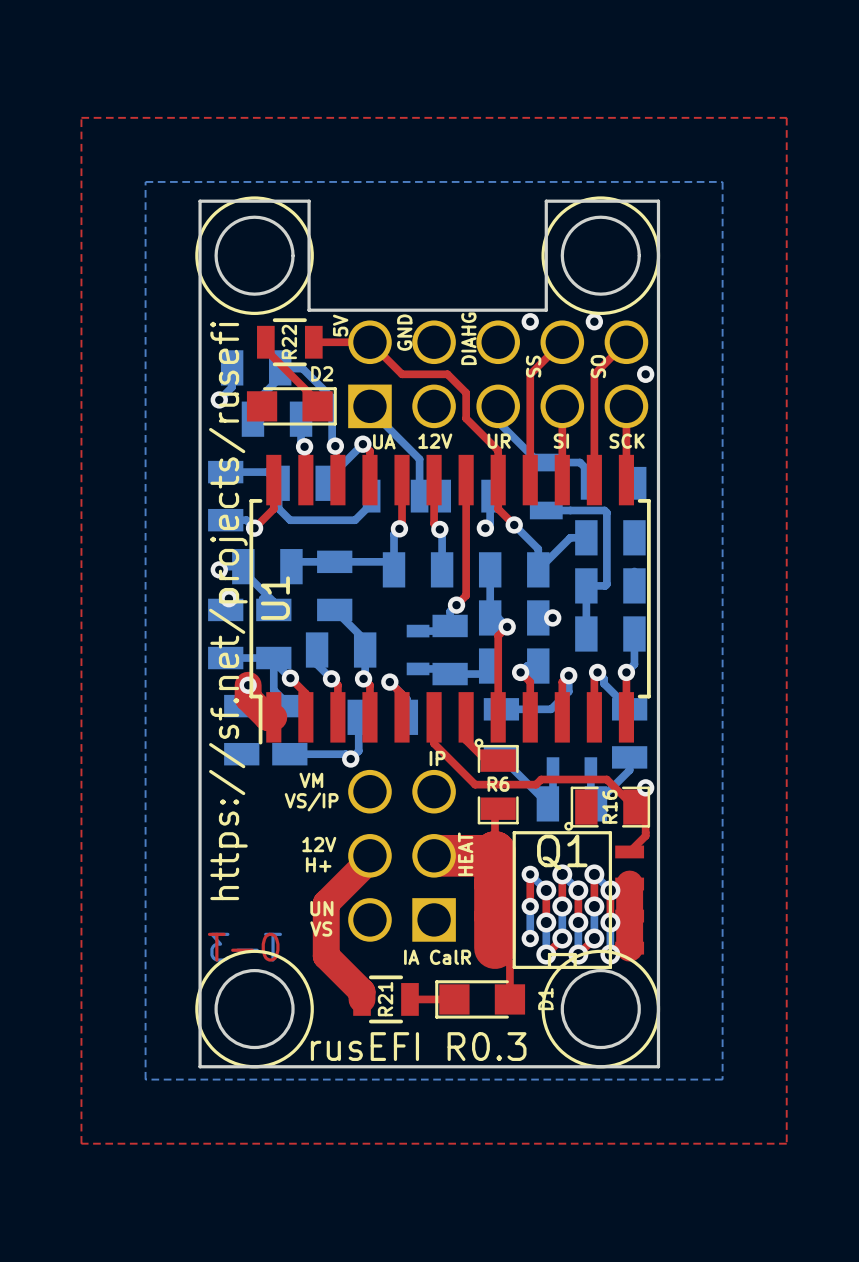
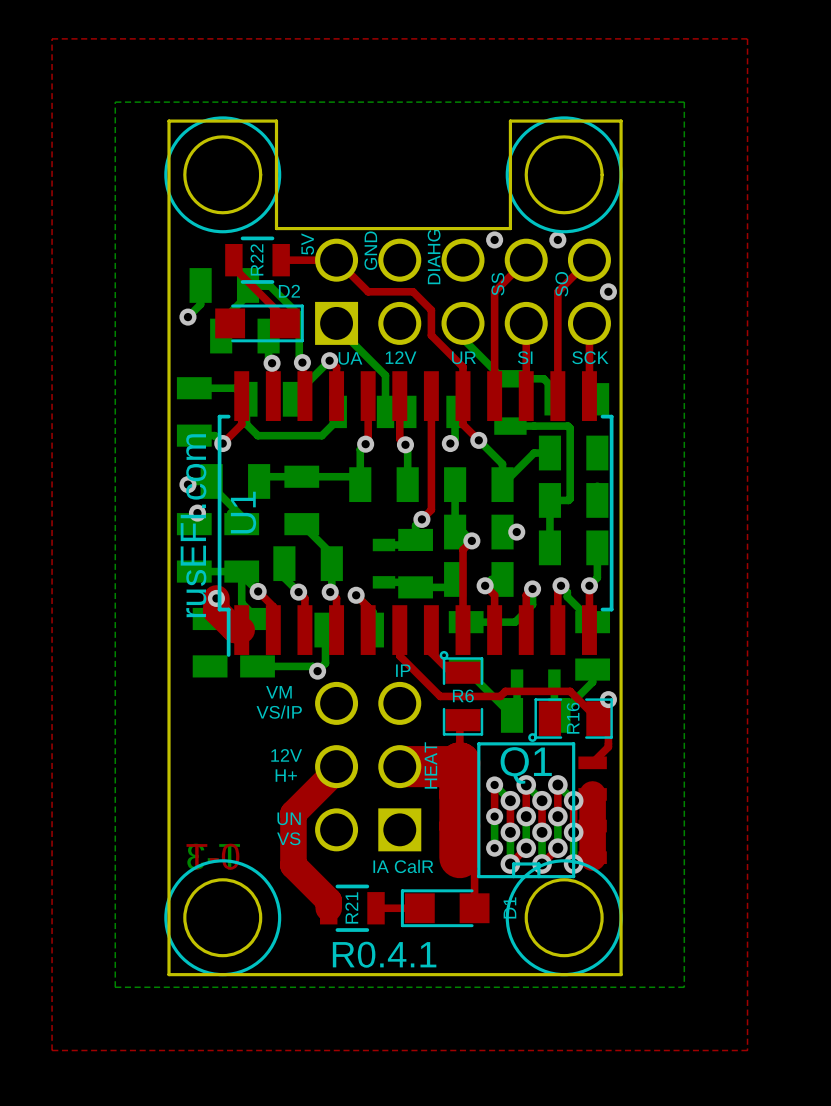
text: https://sf.net/projects/rusefi (228, 610) -> rusEFI.com (193, 525)
text: rusEFI R0.3 (418, 1046) -> R0.4.1 (384, 954)

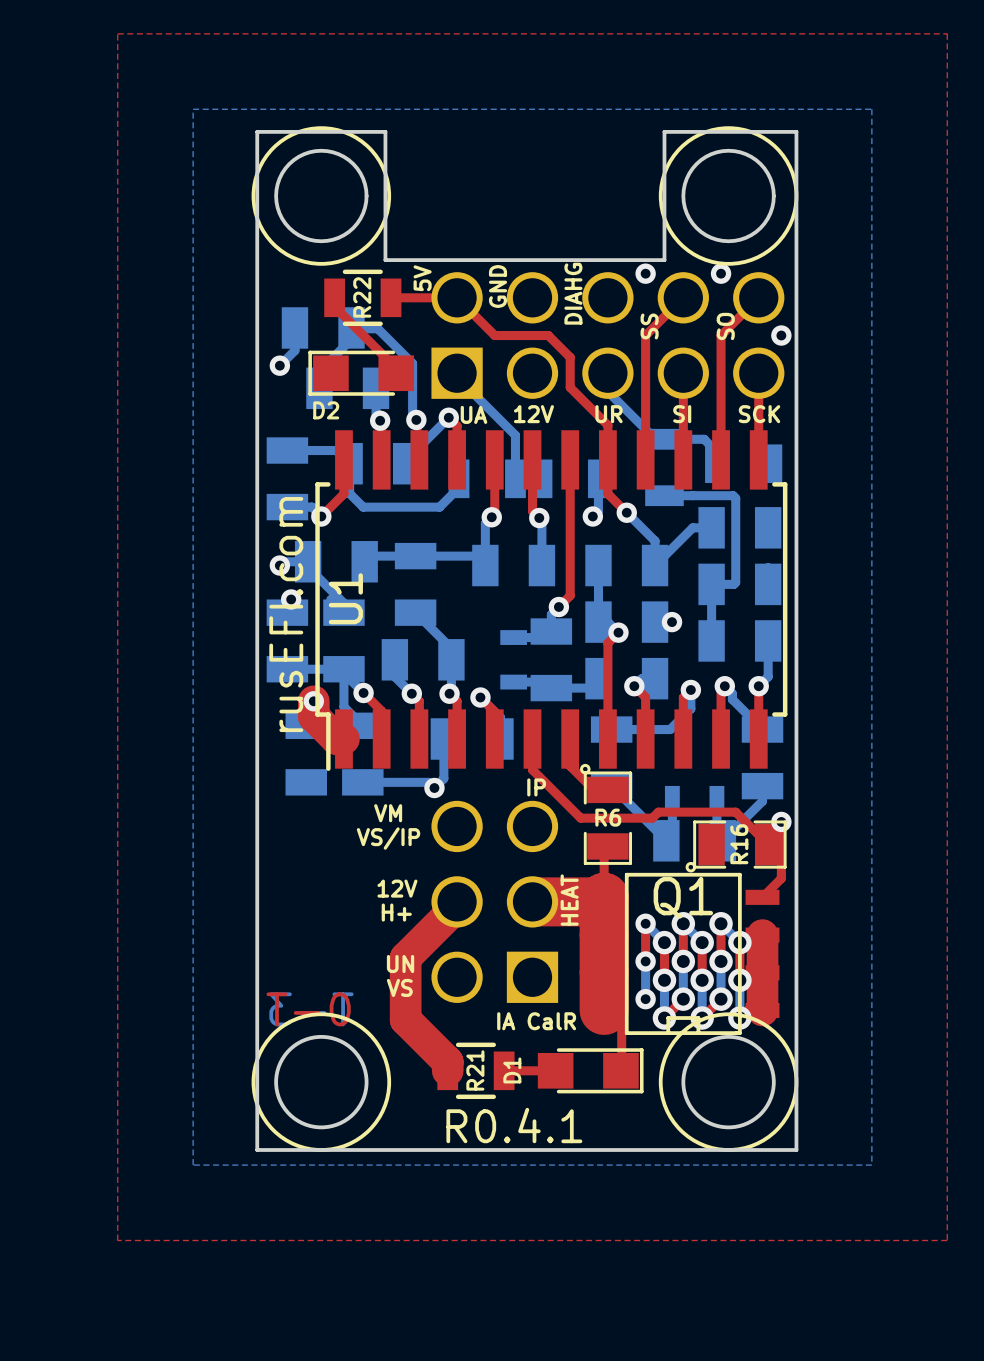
D2 rotation: 0° (259, 323) -> 180° (361, 373)
D1 rotation: 0° (445, 908) -> 180° (590, 1070)

